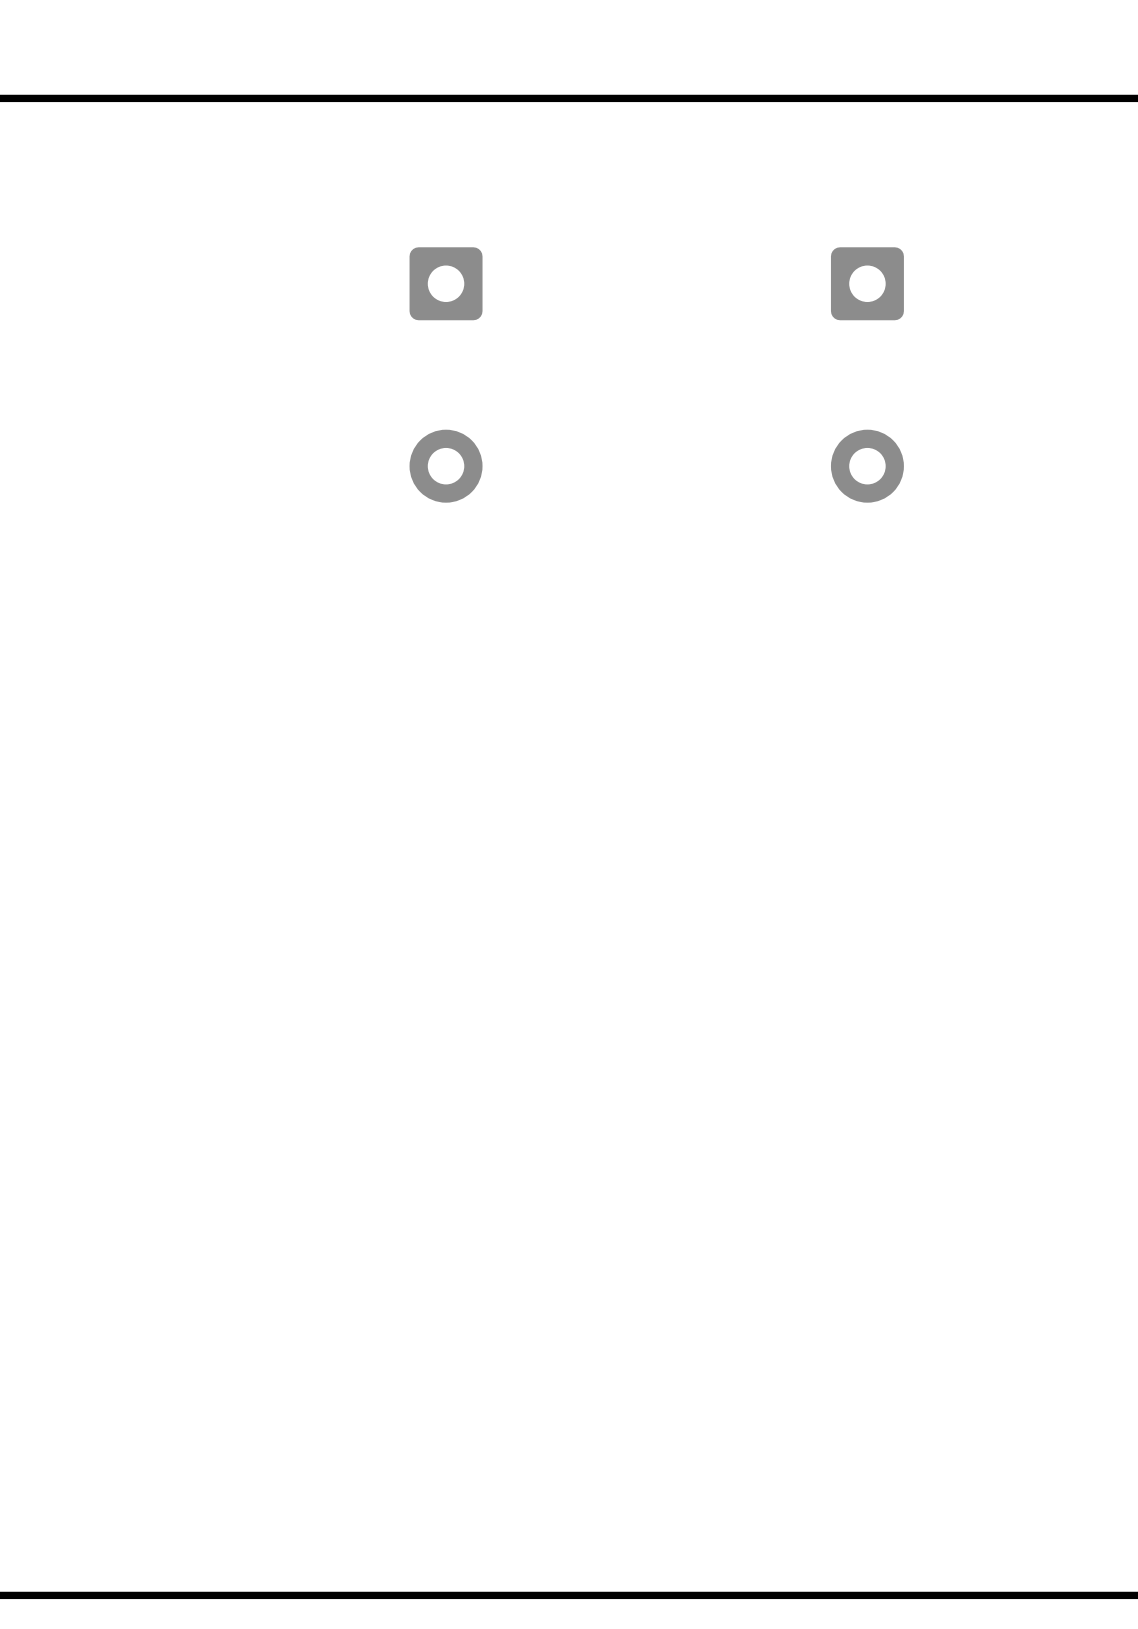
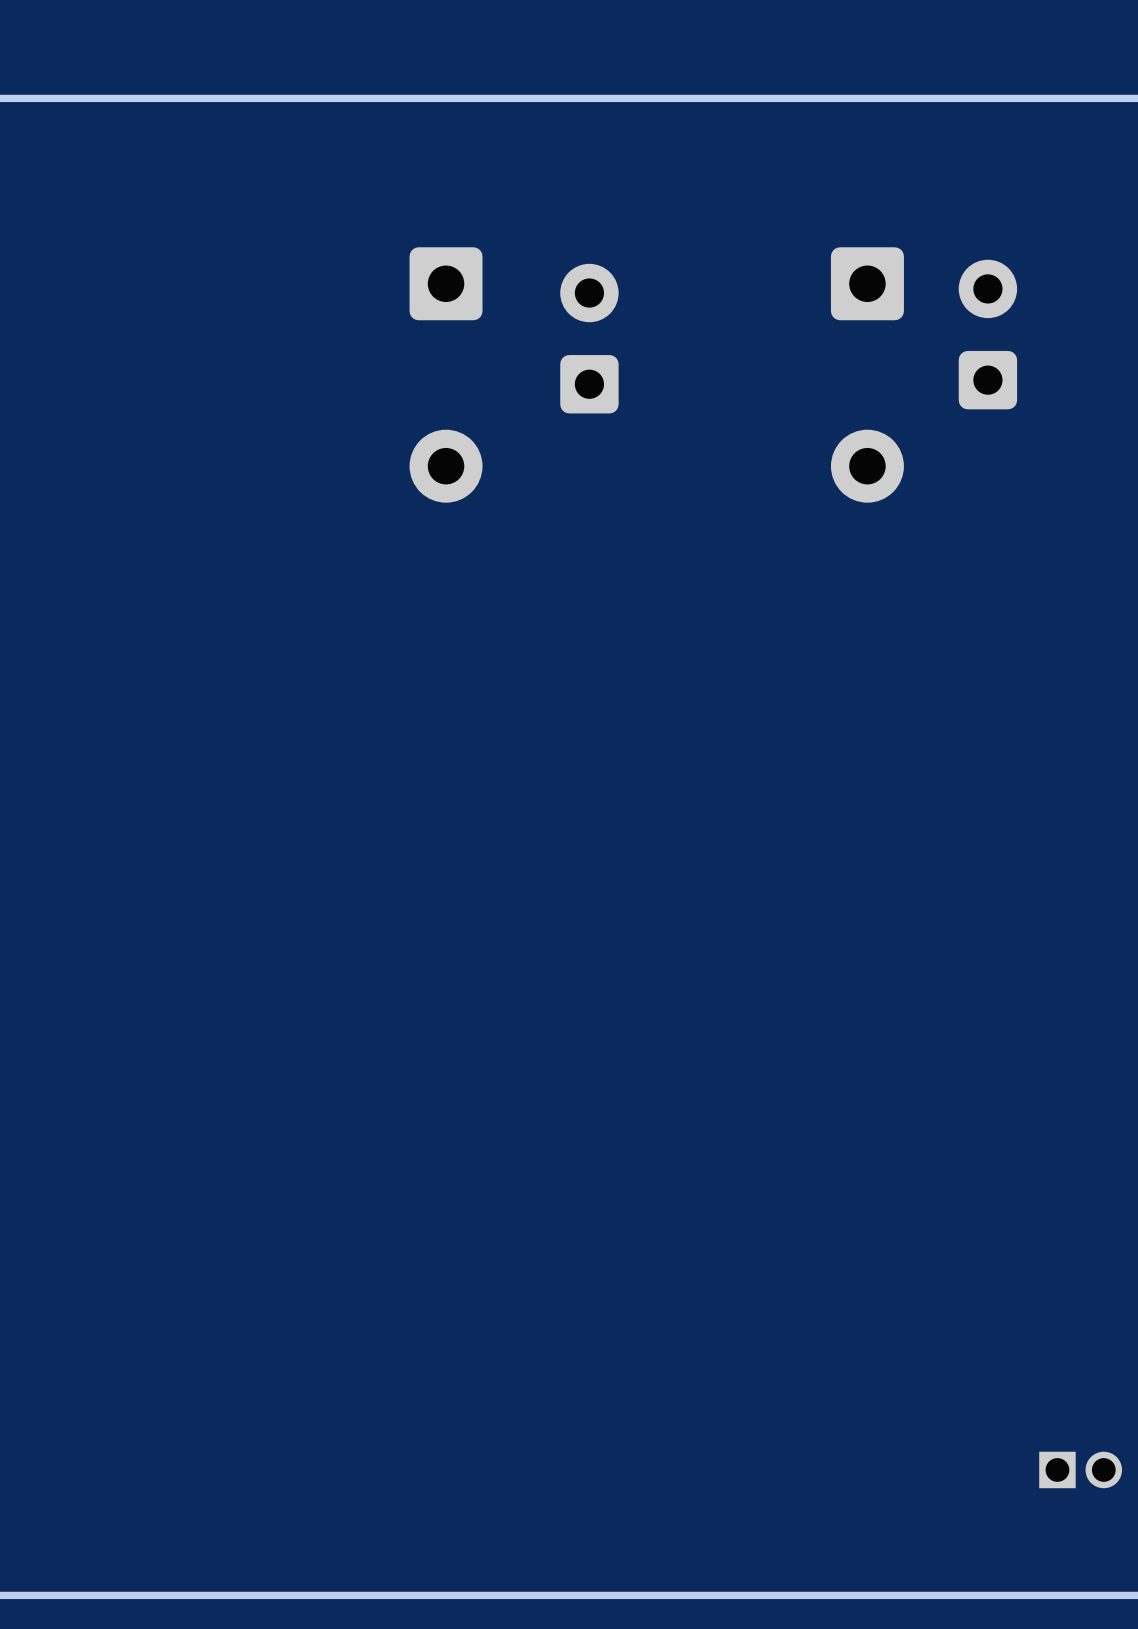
part: none -> (987, 334)
part: none -> (589, 338)
part: none -> (1080, 1469)

